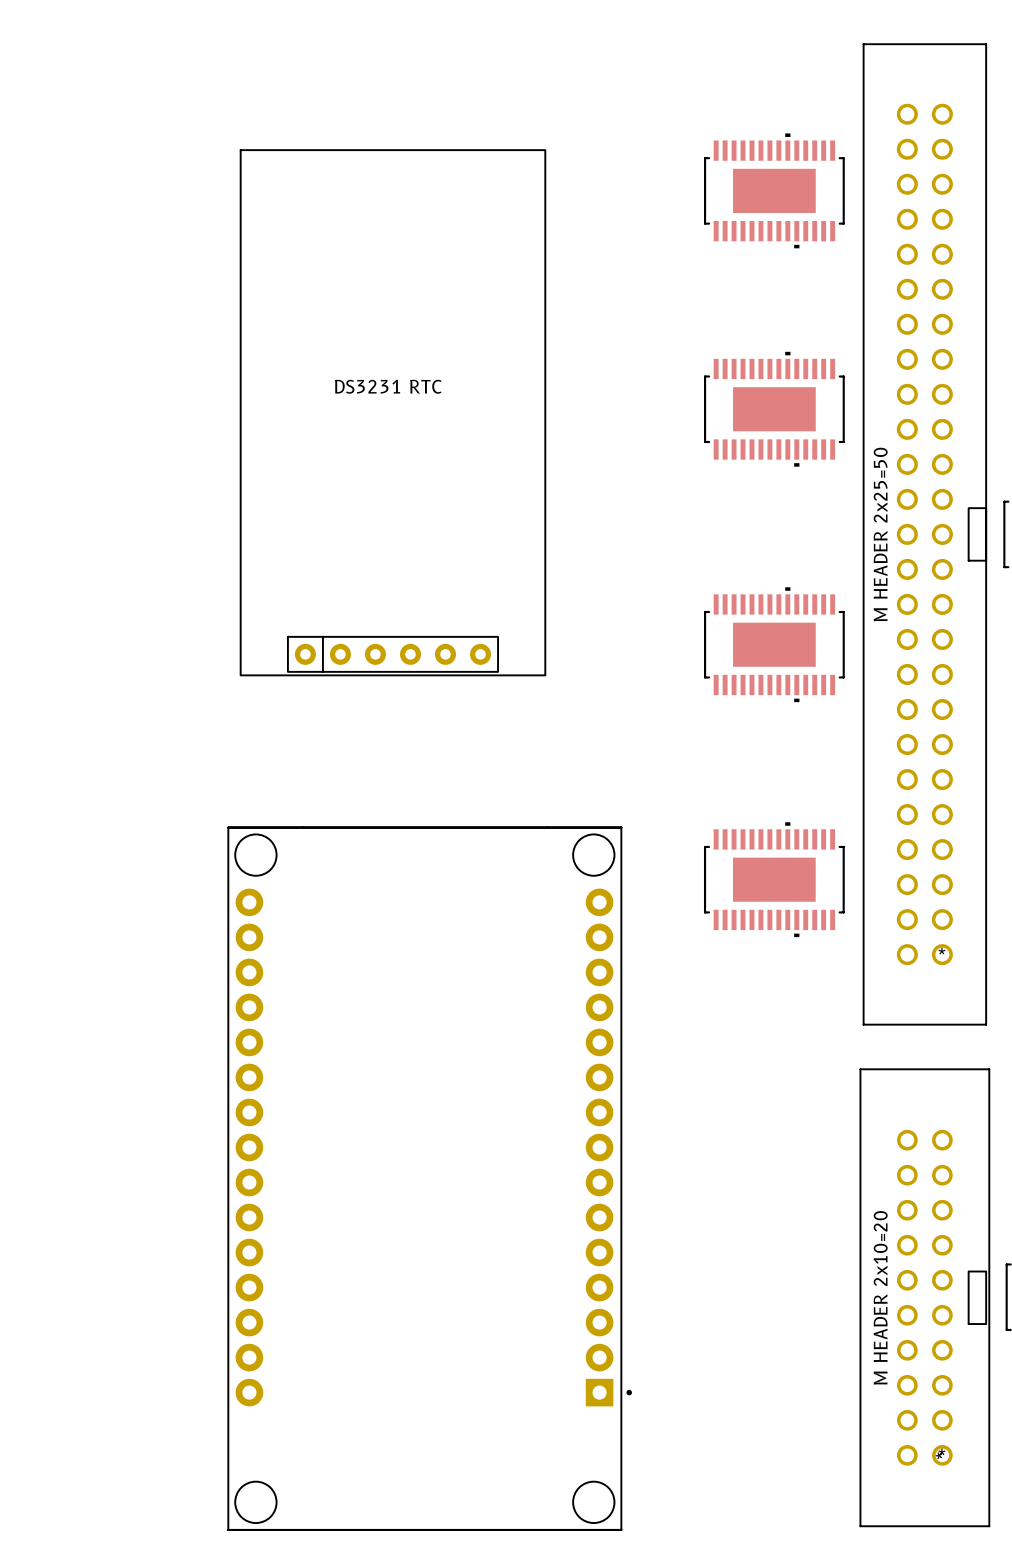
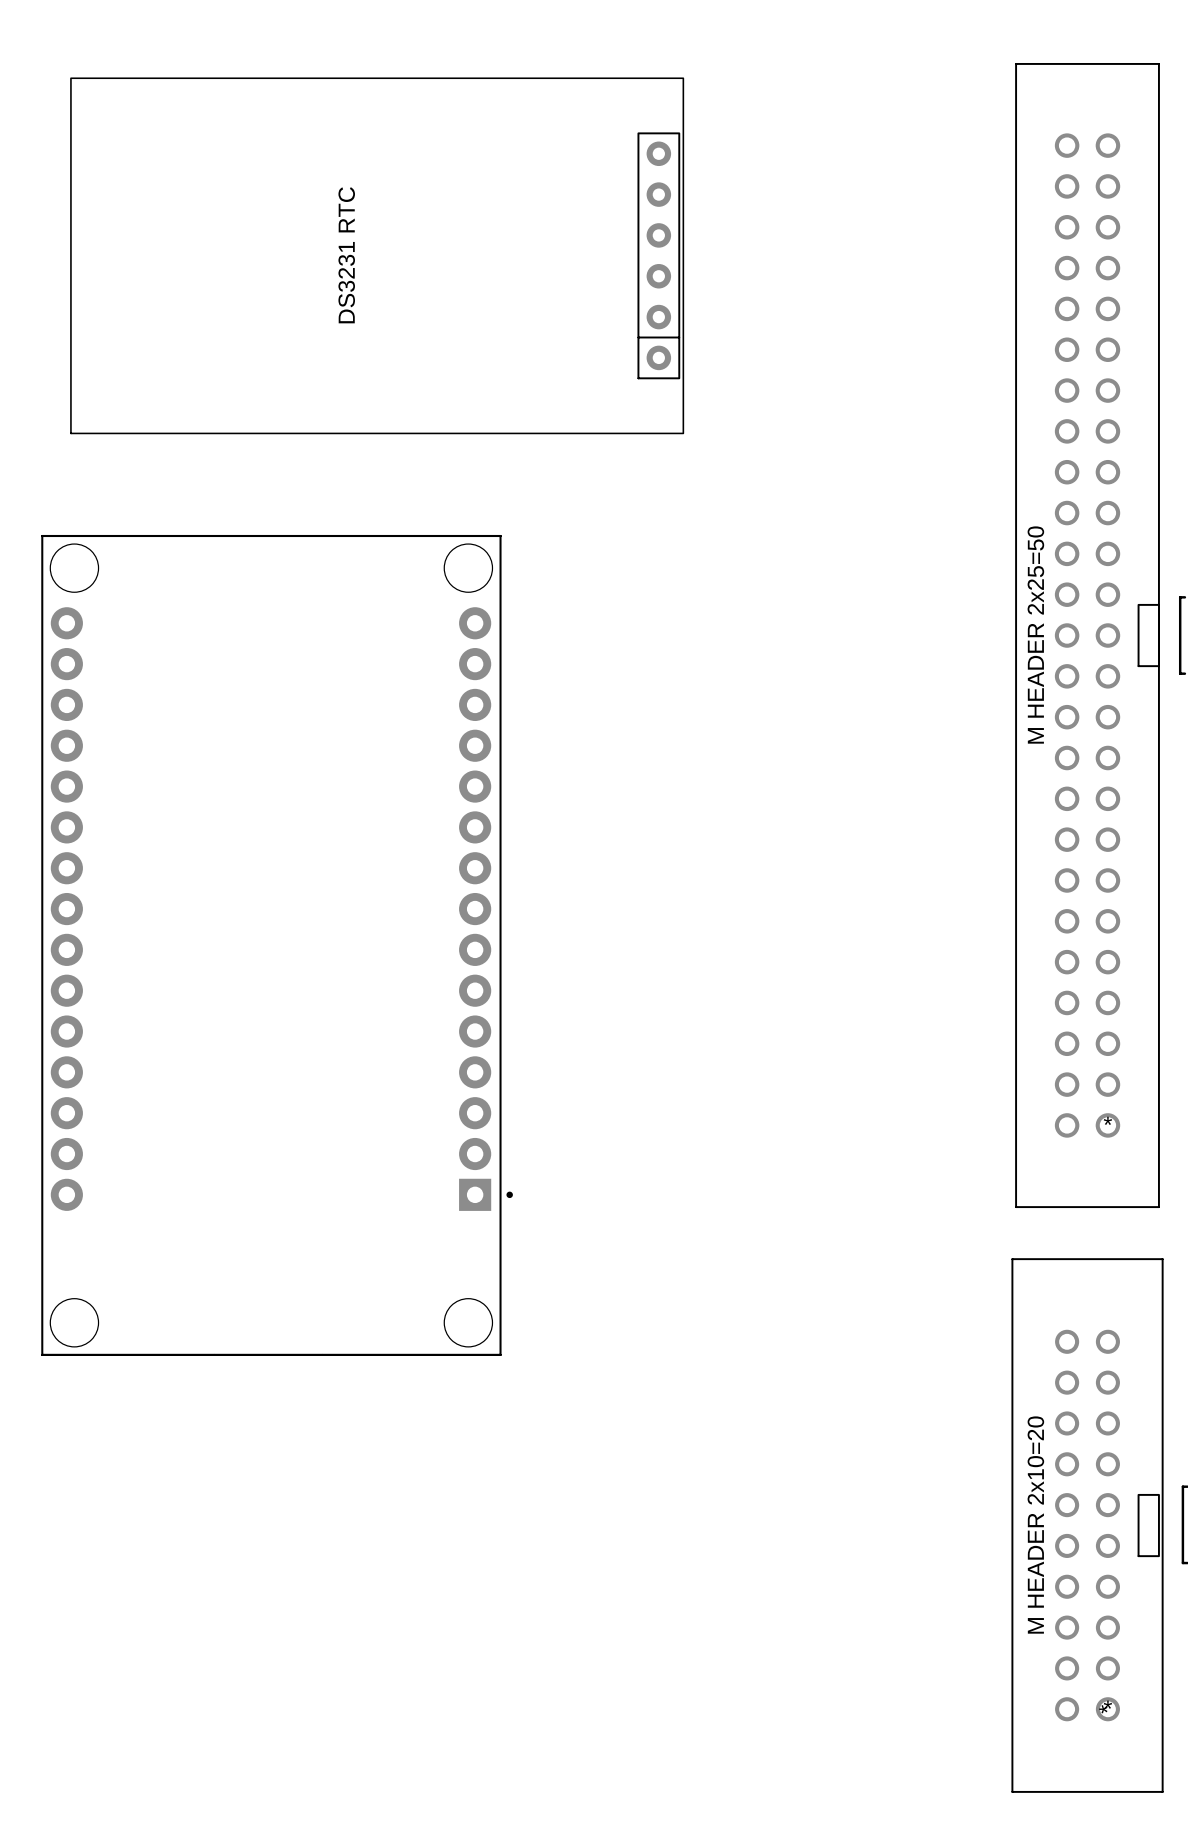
part: (774, 190) -> none
part: (774, 409) -> none
part rotation: 0° (392, 412) -> 90° counterclockwise (377, 255)
part: (774, 644) -> none
part: none -> (277, 945)
part: (774, 879) -> none
part: (429, 1178) -> none

